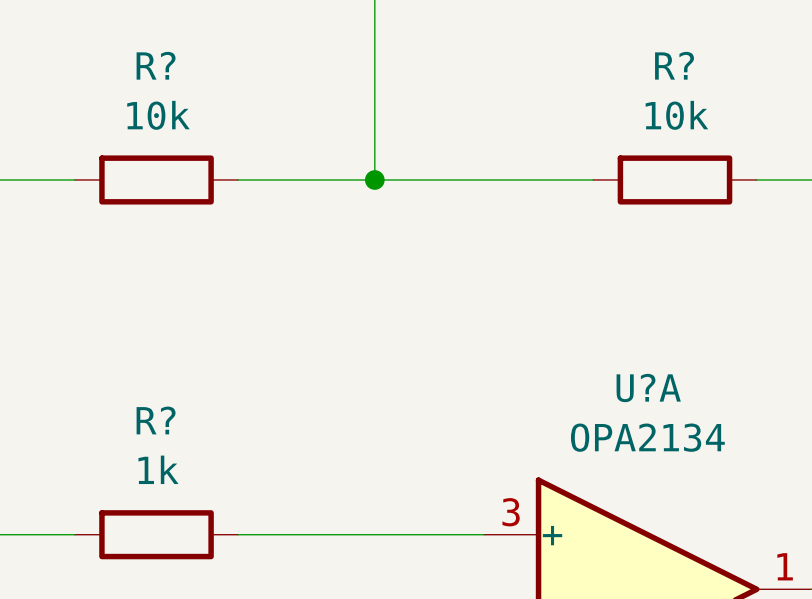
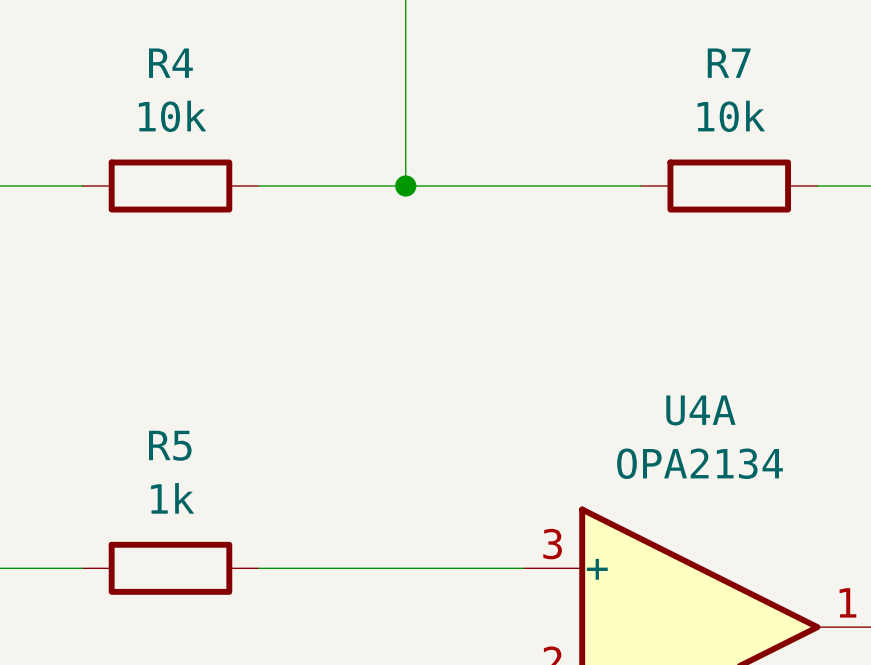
R? name: R? (156, 65) -> R4 (170, 63)
R? name: R? (674, 65) -> R7 (729, 63)
U?A name: U?A (648, 388) -> U4A (700, 410)
R? name: R? (156, 420) -> R5 (170, 445)

